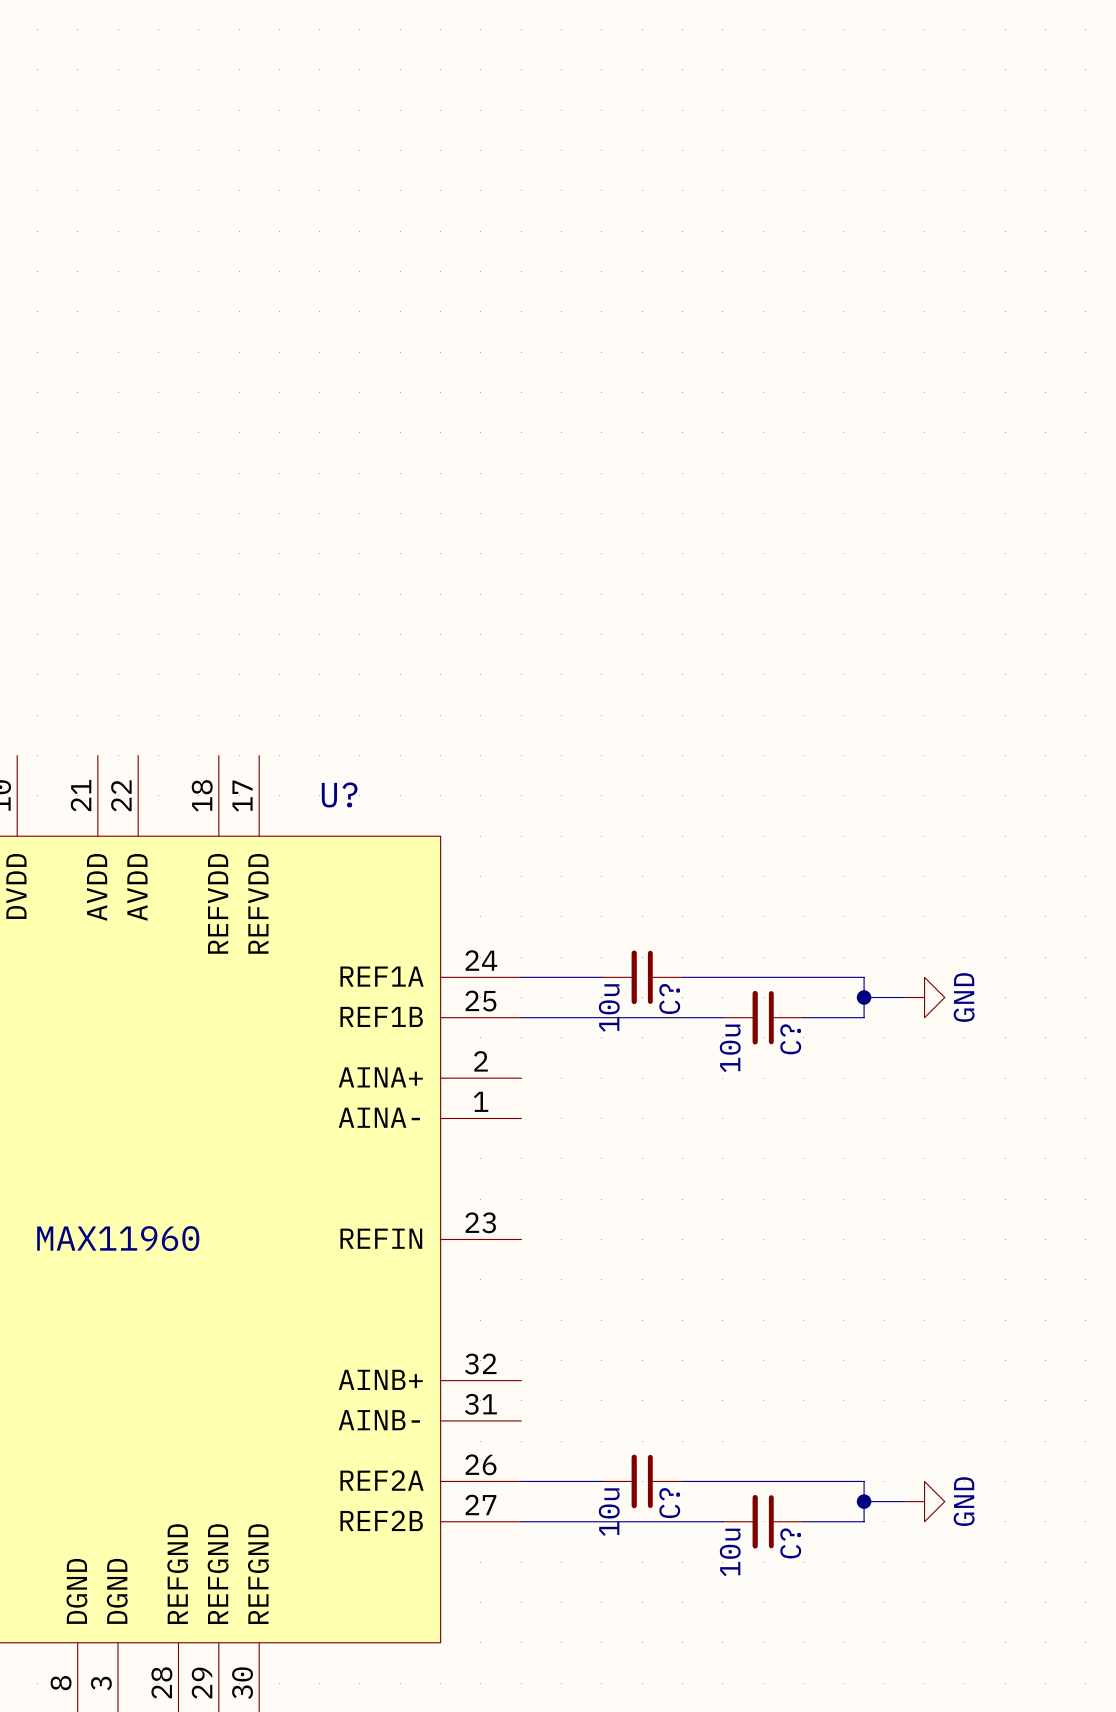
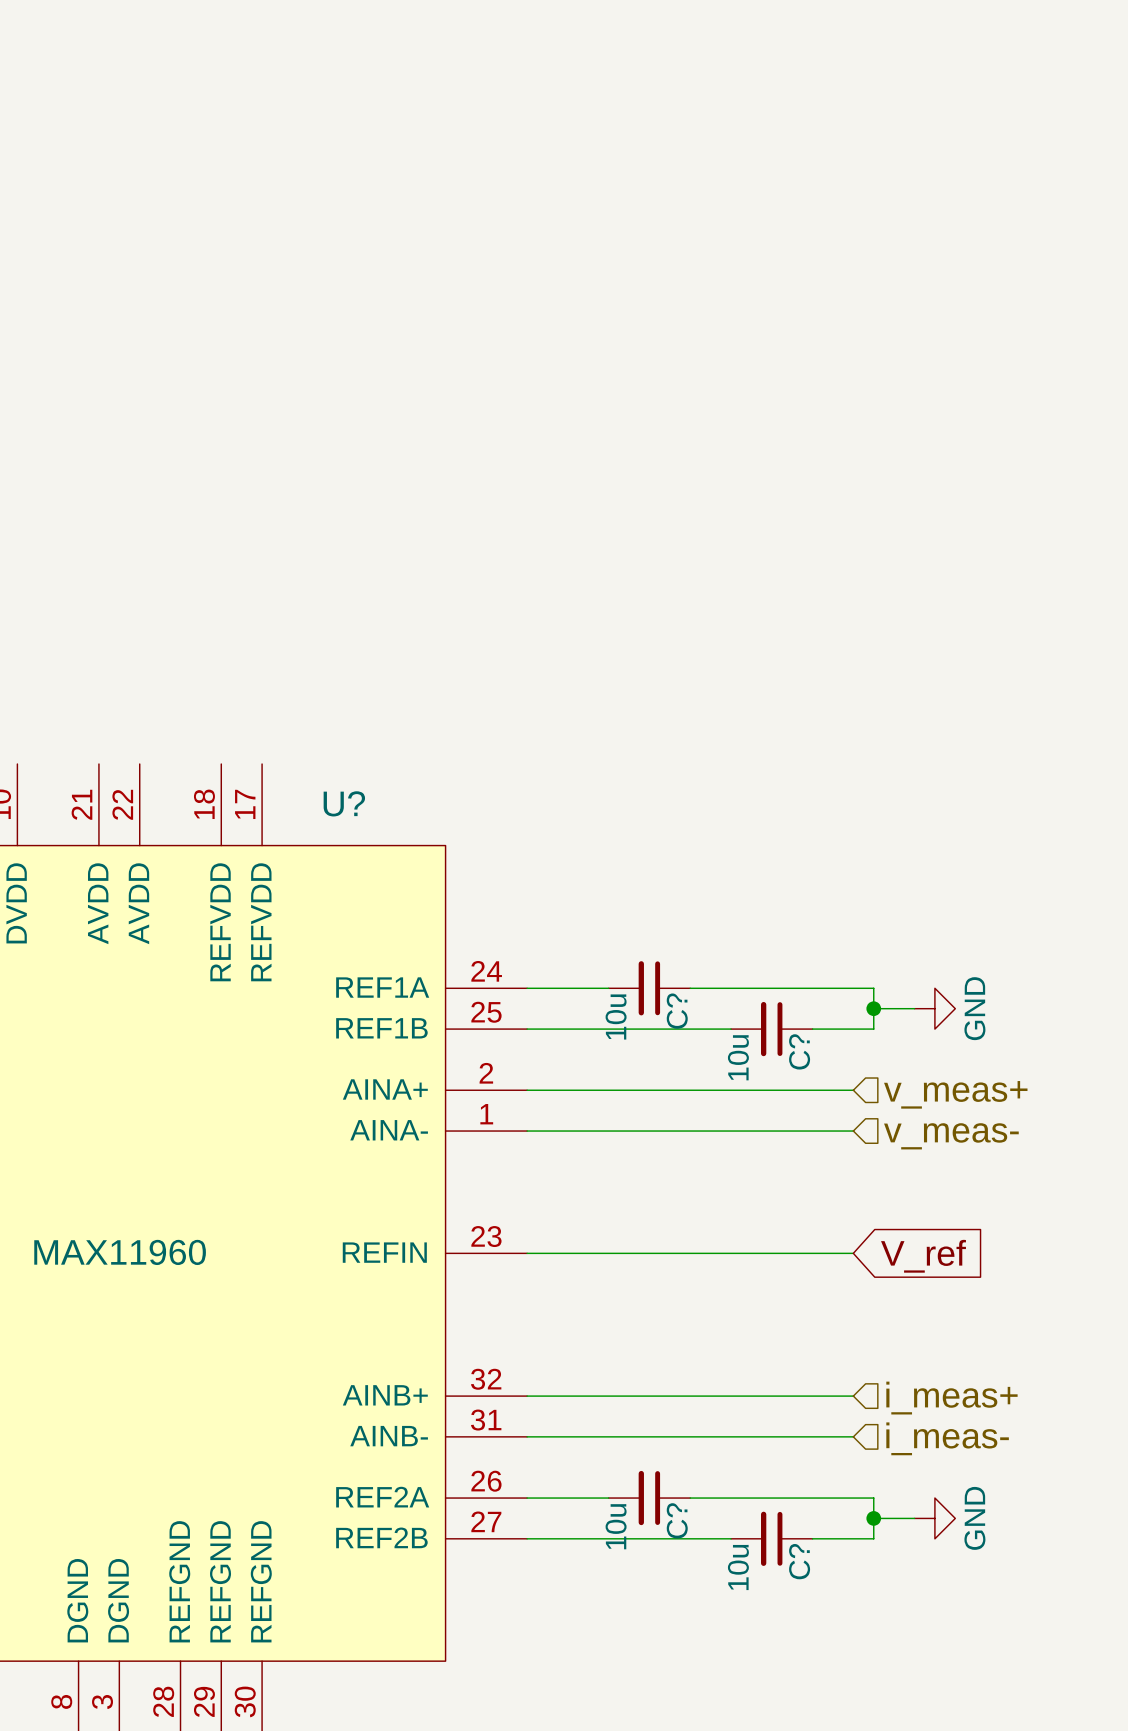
wire: none -> (527, 1090) (853, 1090)
hierarchical label: none -> v_meas+ (955, 1094)
wire: none -> (527, 1131) (853, 1131)
hierarchical label: none -> v_meas- (951, 1136)
wire: none -> (527, 1253) (853, 1253)
global label: none -> V_ref (923, 1256)
wire: none -> (527, 1396) (853, 1396)
hierarchical label: none -> i_meas+ (951, 1398)
wire: none -> (527, 1436) (853, 1436)
hierarchical label: none -> i_meas- (947, 1438)

